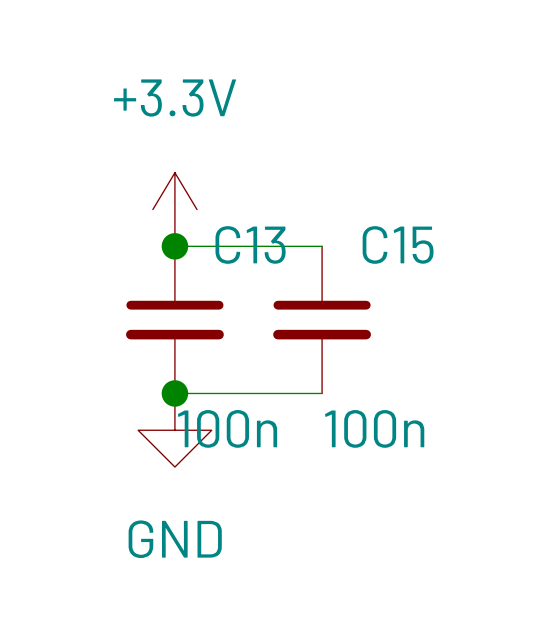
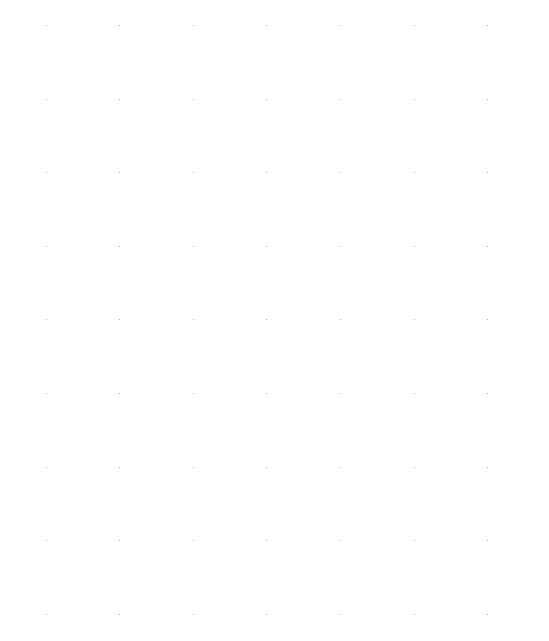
power symbol: +3.3V (174, 209) -> none
wire: (174, 246) (322, 246) -> none
junction: (174, 246) -> none
C13: 100n (174, 319) -> none
C15: 100n (322, 319) -> none
wire: (174, 393) (322, 393) -> none
junction: (174, 393) -> none
power symbol: GND (174, 430) -> none

